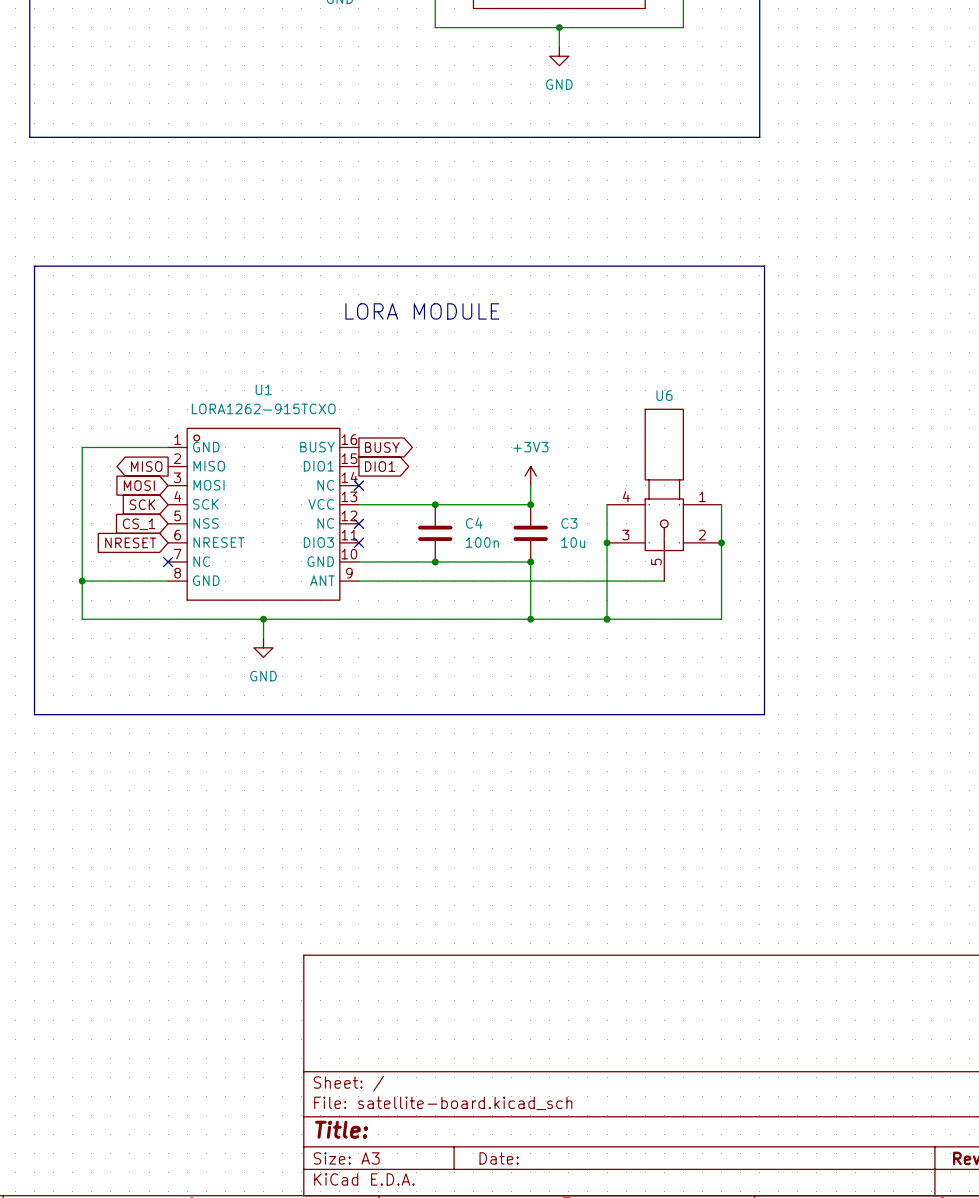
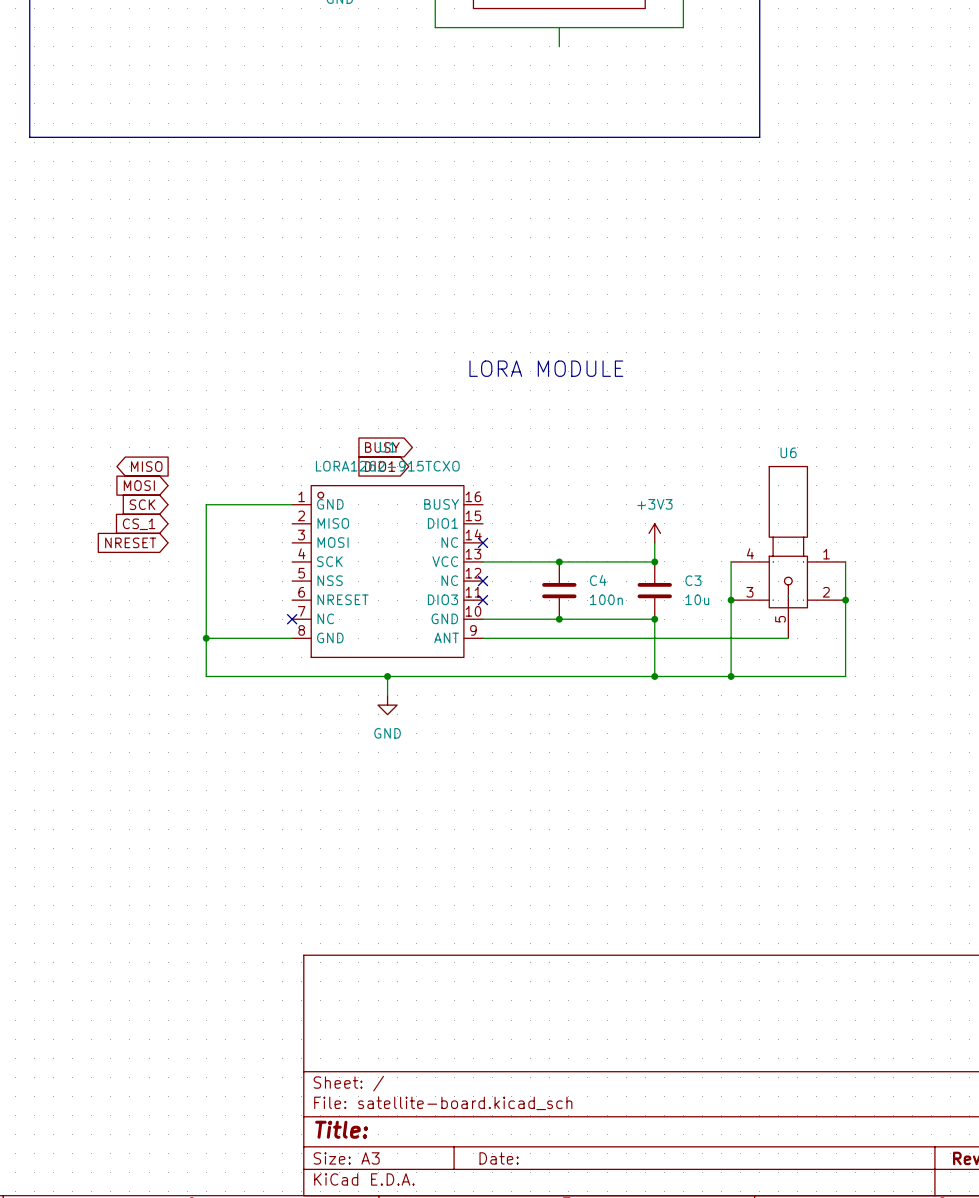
junction: (559, 27) -> none
power symbol: GND (559, 56) -> none
line: (34, 266) (764, 266) (764, 714) (34, 714) (34, 266) -> none
text position: LORA MODULE (422, 311) -> LORA MODULE (546, 368)
wire: (168, 447) (82, 447) (82, 619) (482, 619) -> none
power symbol position: +3V3 (530, 476) -> +3V3 (654, 533)
no-connect mark: (358, 485) -> none
wire: (530, 485) (530, 504) (358, 504) -> none
U6 position: (664, 495) -> (788, 552)
wire: none -> (292, 504) (206, 504) (206, 676) (845, 676) (845, 561)
junction: (435, 504) -> none
junction: (530, 504) -> none
wire: (607, 504) (607, 619) -> (731, 561) (731, 676)
wire: (721, 504) (721, 619) (654, 619) -> (654, 676) (654, 619)
U1 position: (263, 514) -> (387, 571)
no-connect mark: (358, 523) -> none
C4 position: (435, 533) -> (559, 590)
C3 position: (530, 533) -> (654, 590)
no-connect mark: (358, 542) -> none
no-connect mark: none -> (482, 542)
junction: (607, 542) -> none
junction: (721, 542) -> none
no-connect mark: (168, 561) -> none
wire: (358, 561) (482, 561) -> none
junction: (435, 561) -> none
wire: (530, 561) (530, 619) -> (530, 561) (654, 561) (654, 542)
junction: (530, 561) -> none
junction: none -> (559, 561)
junction: none -> (654, 561)
wire: (82, 581) (168, 581) -> (206, 638) (292, 638)
junction: (82, 581) -> none
wire: (358, 581) (664, 581) -> (482, 638) (788, 638)
no-connect mark: none -> (482, 581)
no-connect mark: none -> (482, 600)
junction: none -> (731, 600)
junction: none -> (845, 600)
wire: (263, 619) (263, 638) -> (387, 676) (387, 695)
junction: (263, 619) -> none
no-connect mark: none -> (292, 619)
junction: (530, 619) -> none
junction: none -> (559, 619)
junction: (607, 619) -> none
junction: none -> (654, 619)
junction: none -> (206, 638)
power symbol position: GND (263, 647) -> GND (387, 705)
junction: none -> (387, 676)
junction: none -> (654, 676)
junction: none -> (731, 676)

